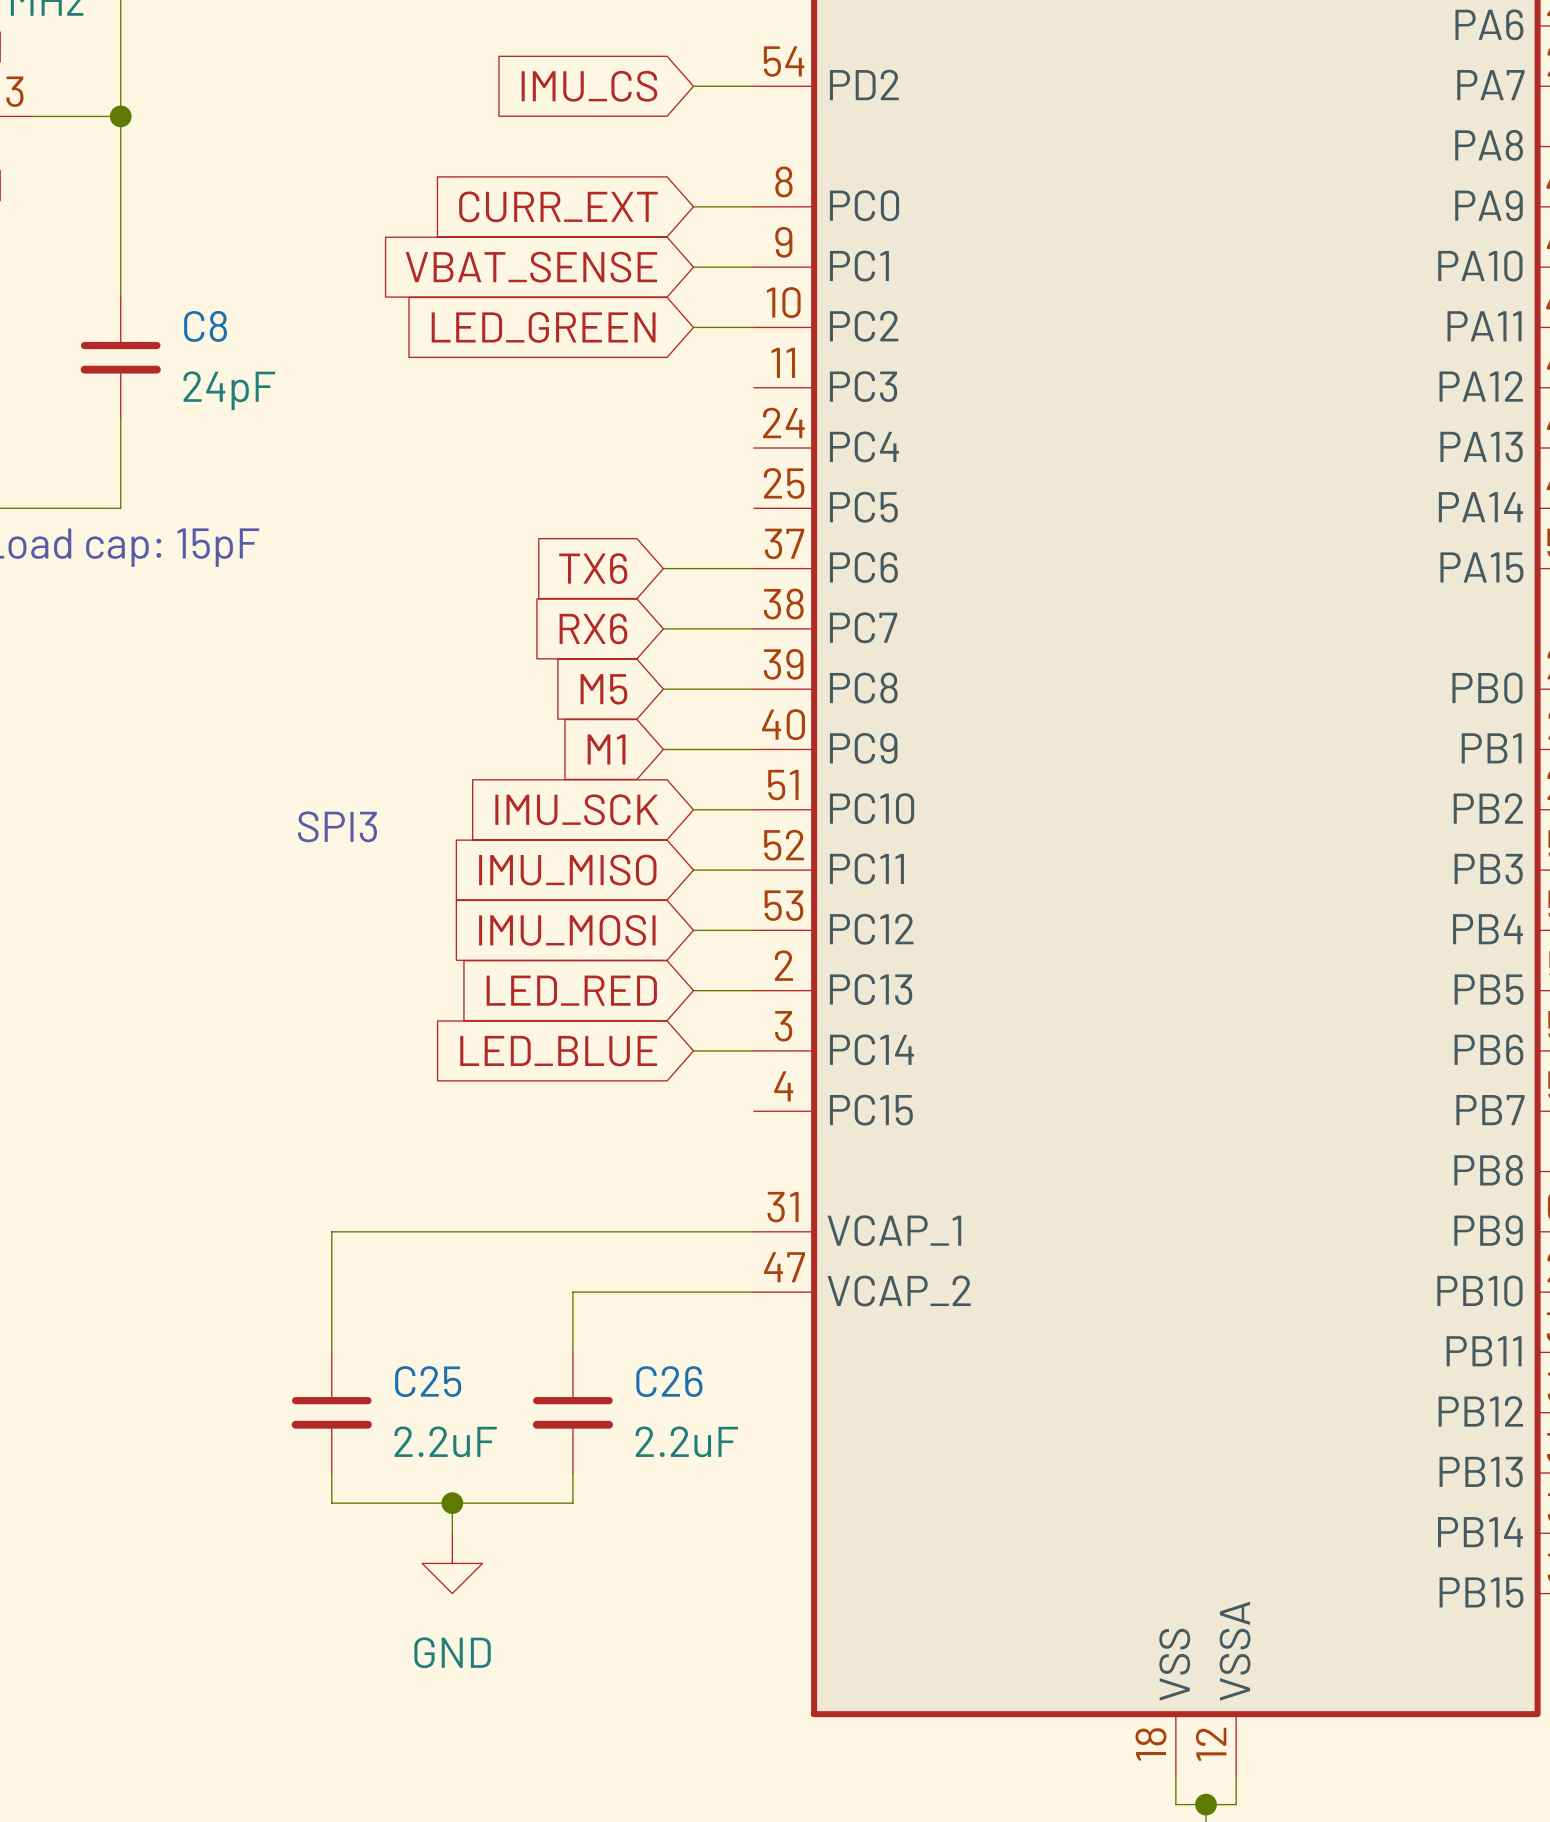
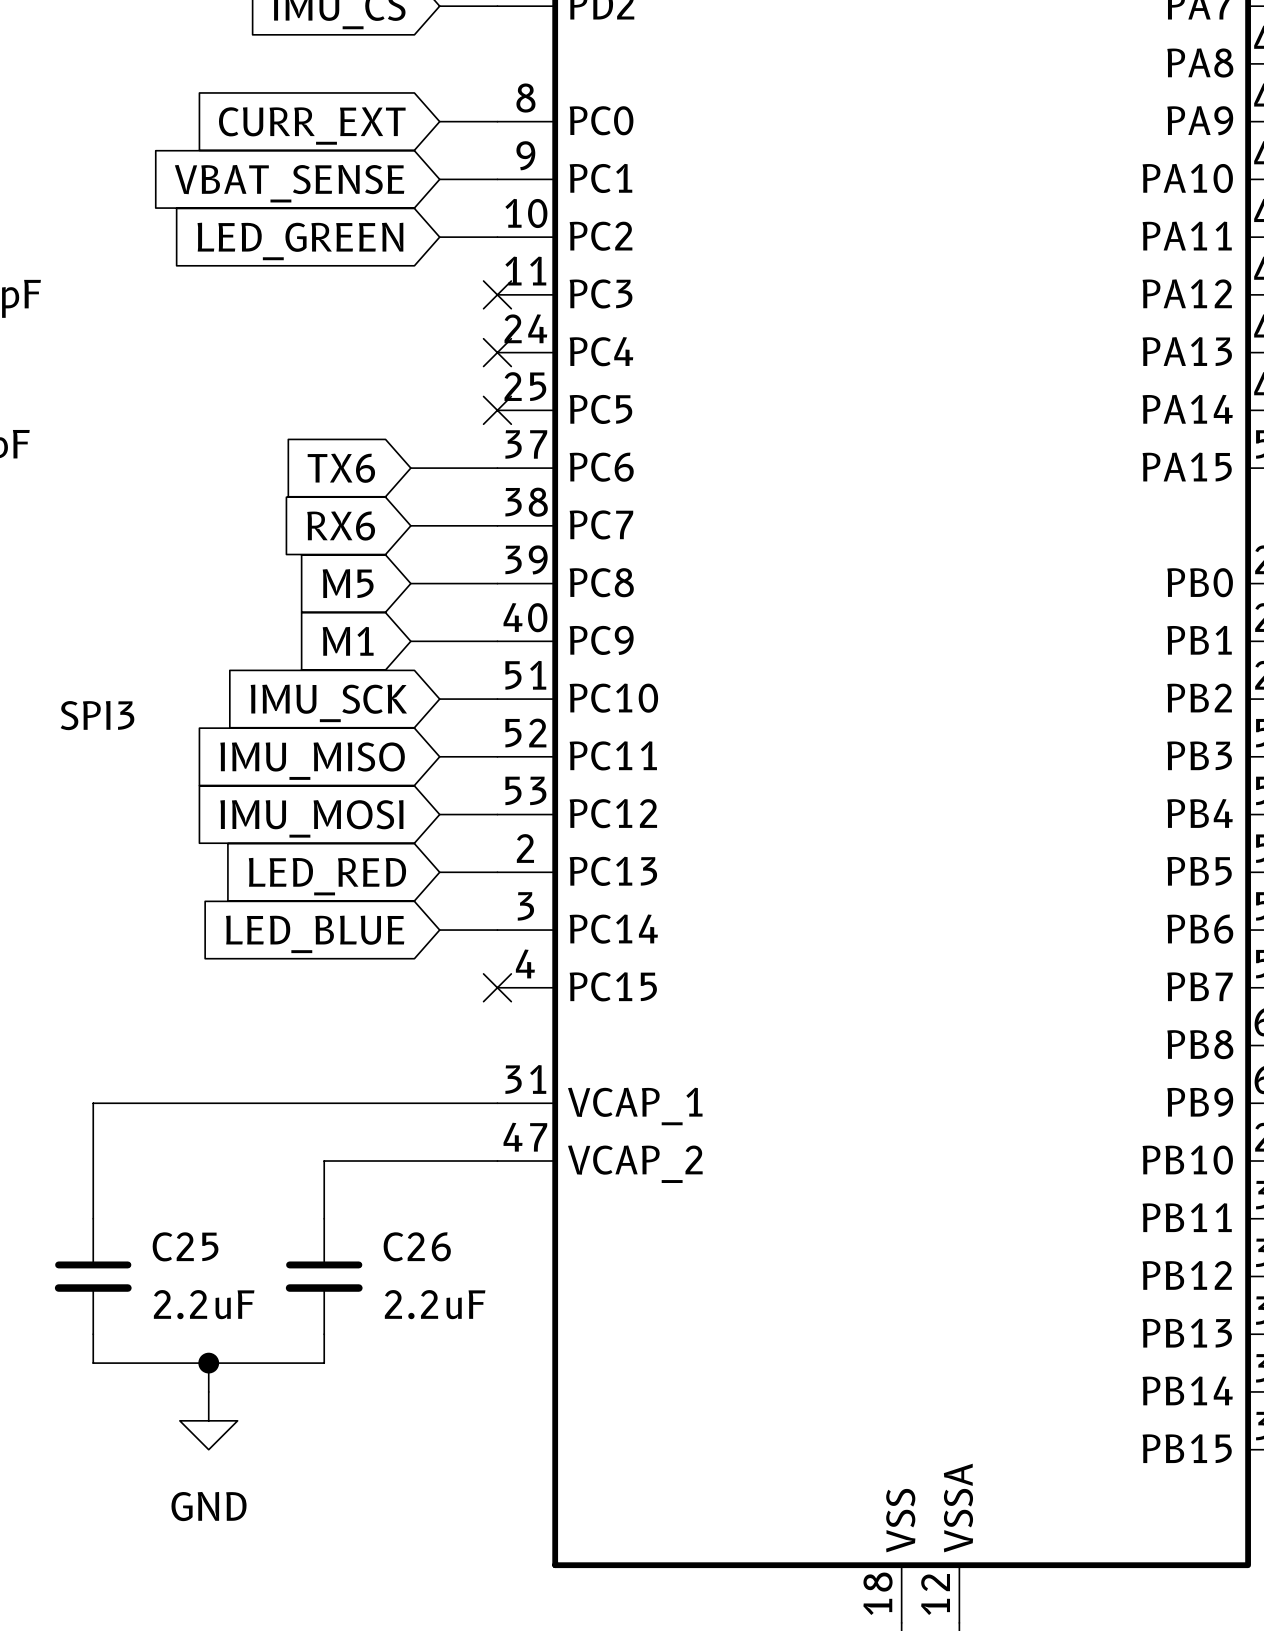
no-connect mark: none -> (497, 294)
no-connect mark: none -> (497, 352)
no-connect mark: none -> (497, 410)
no-connect mark: none -> (497, 987)

